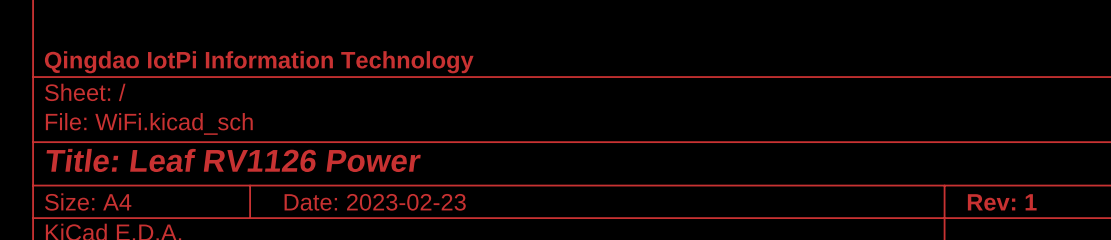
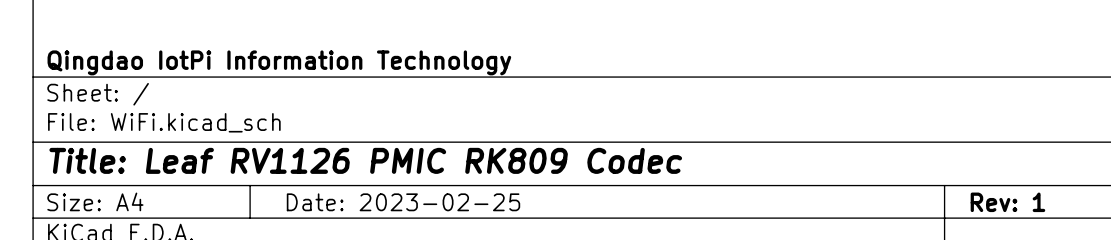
title block: Title: Leaf RV1126 Power (233, 160) -> Title: Leaf RV1126 PMIC RK809 Codec (365, 160)
title block: Date: 2023-02-23 (375, 202) -> Date: 2023-02-25 (403, 202)

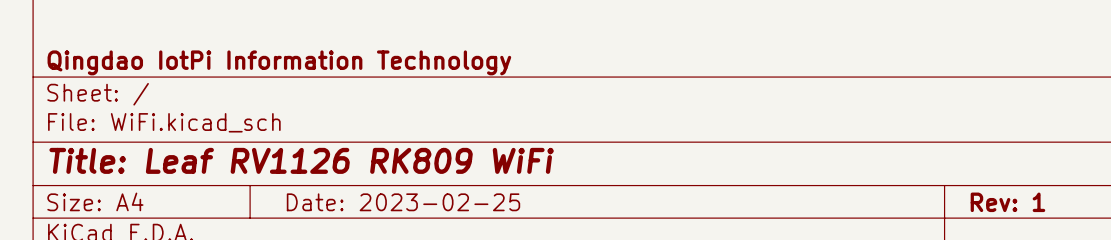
title block: Title: Leaf RV1126 PMIC RK809 Codec (365, 160) -> Title: Leaf RV1126 RK809 WiFi (301, 160)

